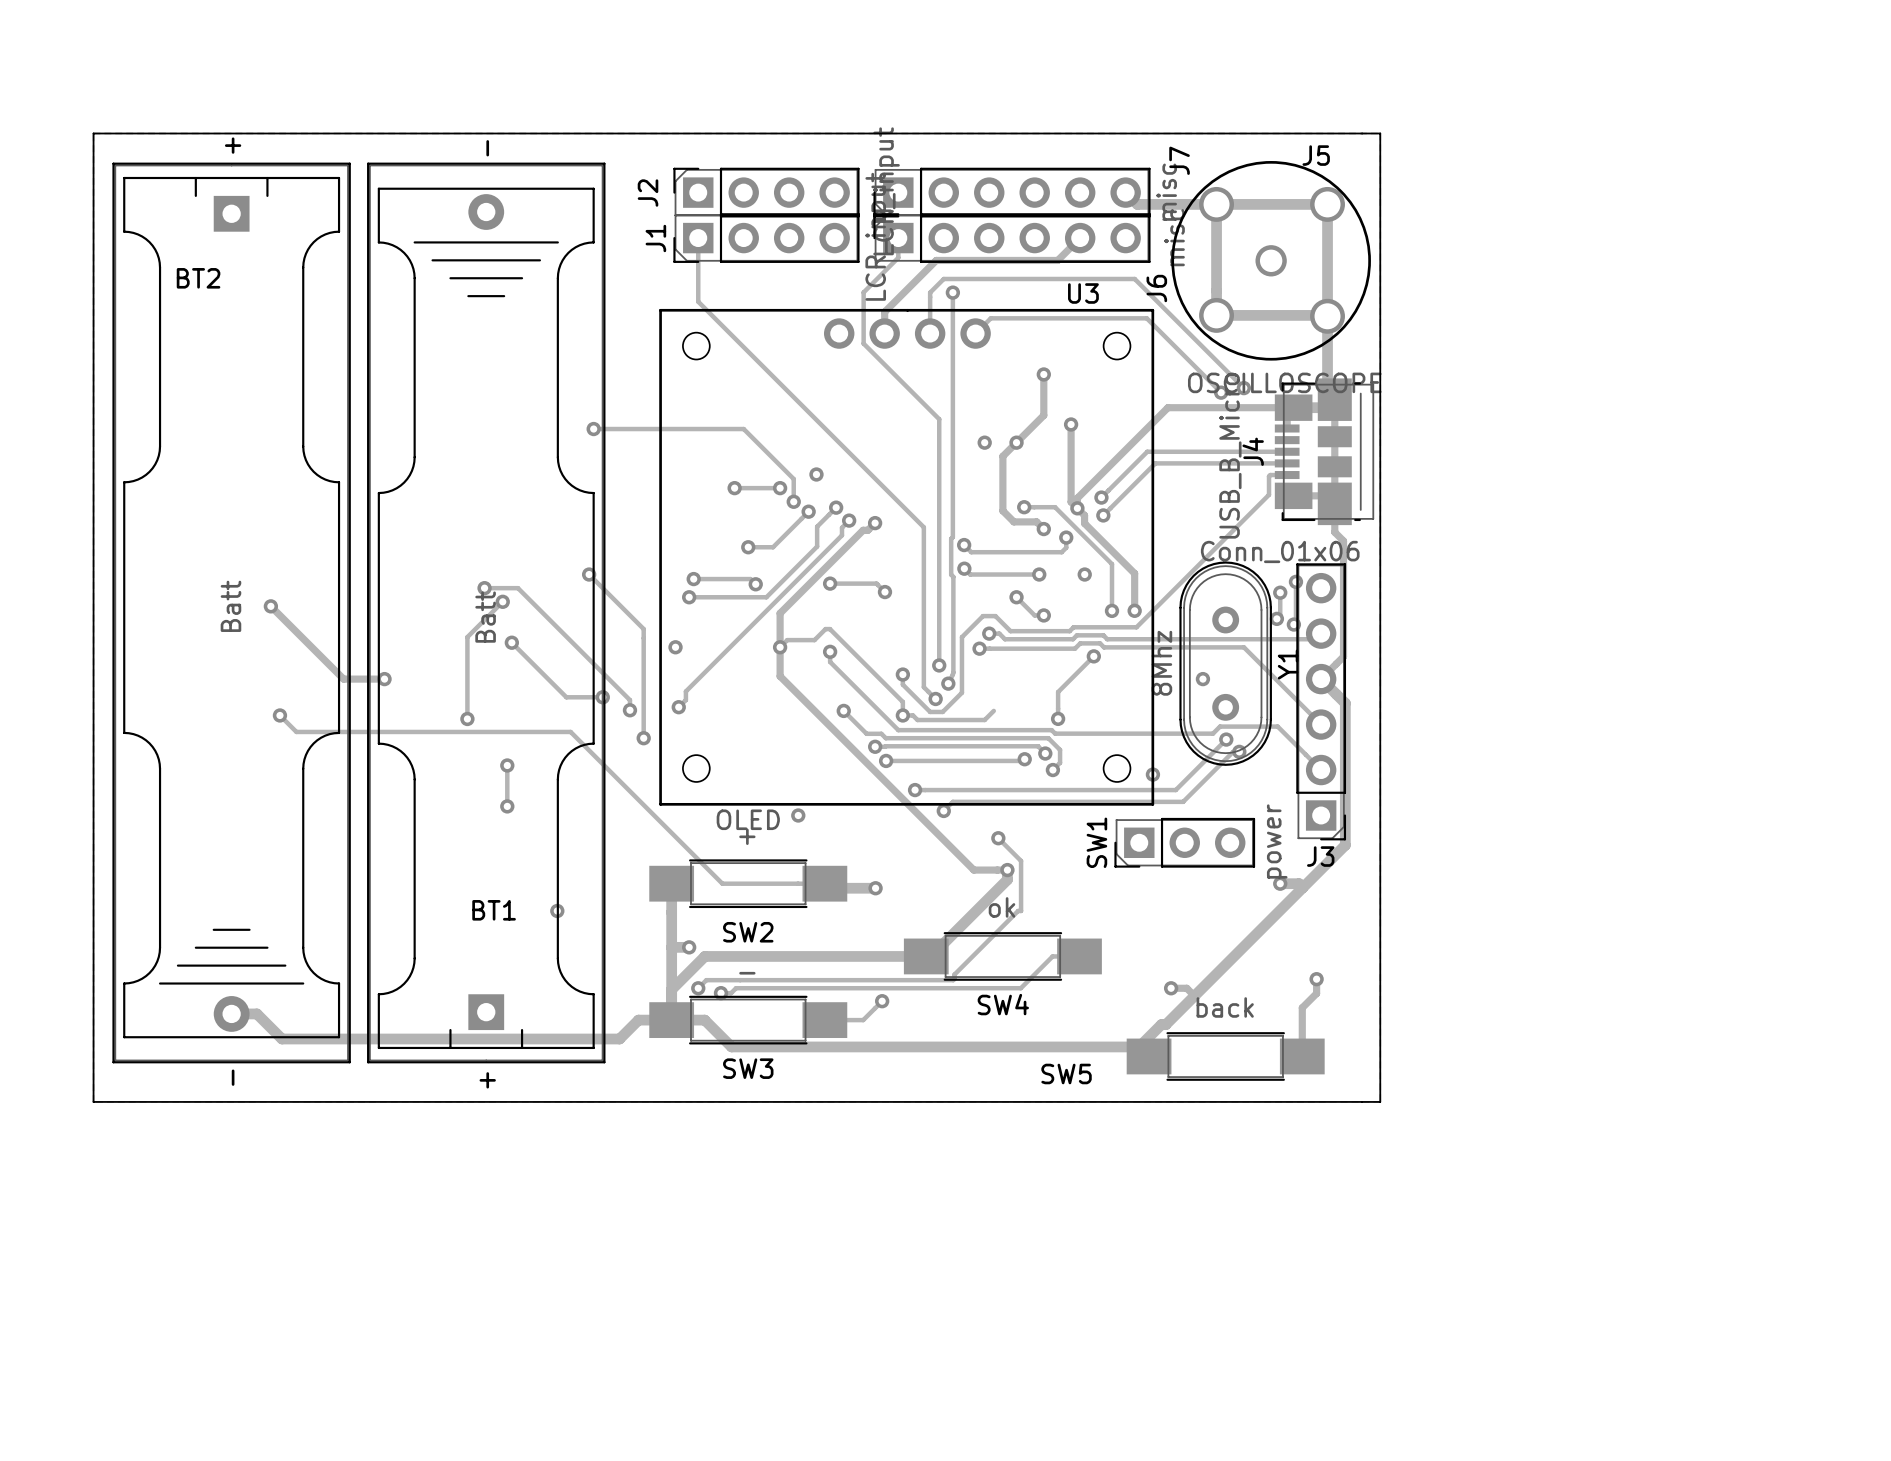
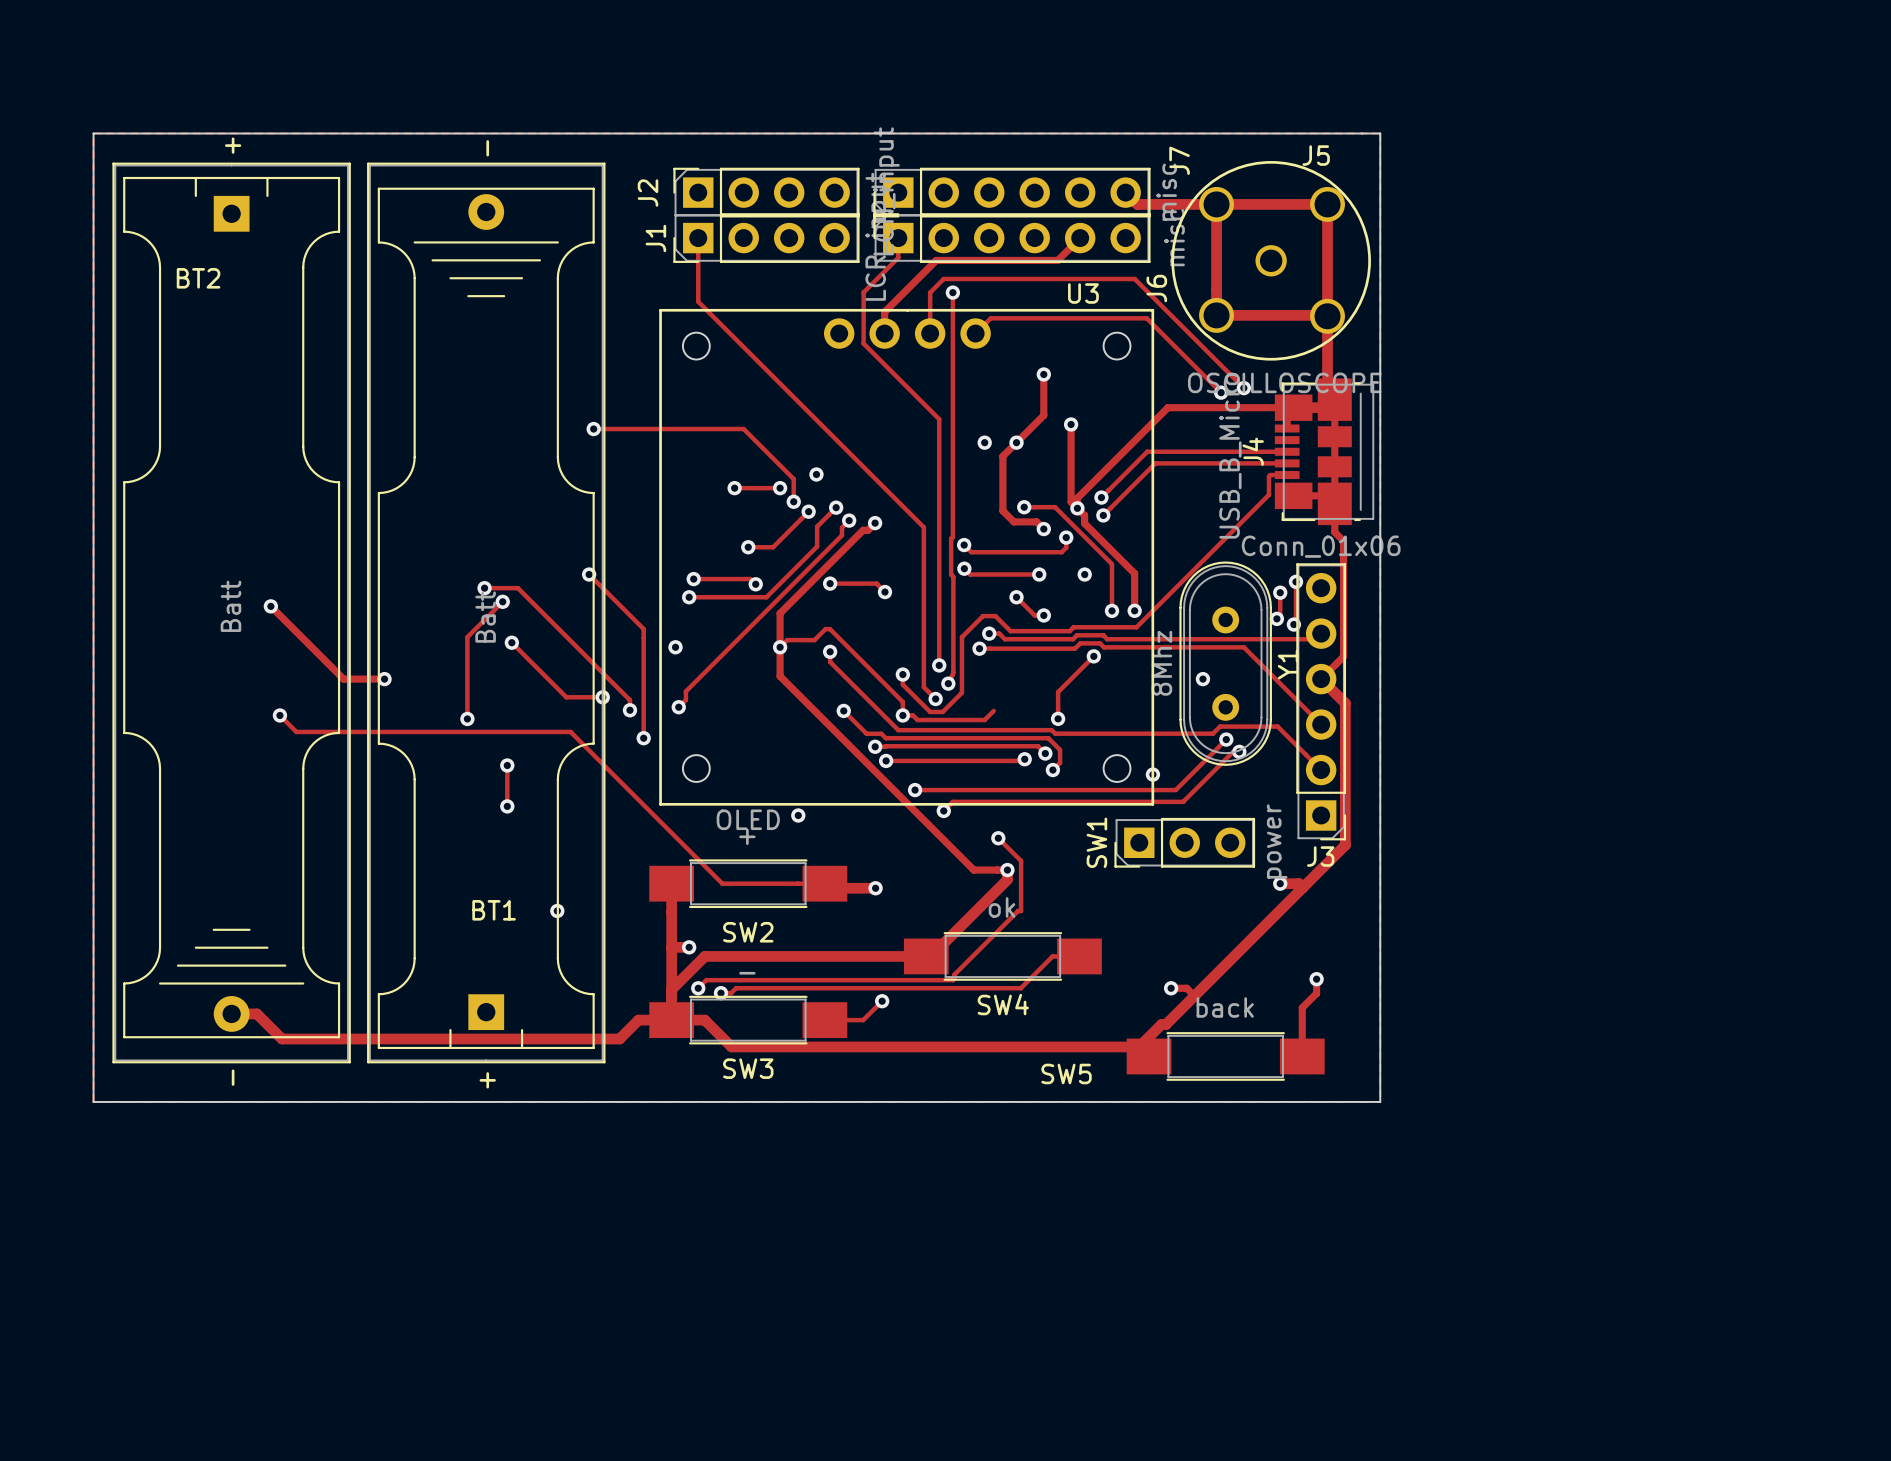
J3 value position: Conn_01x06 (1280, 551) -> Conn_01x06 (1321, 546)

